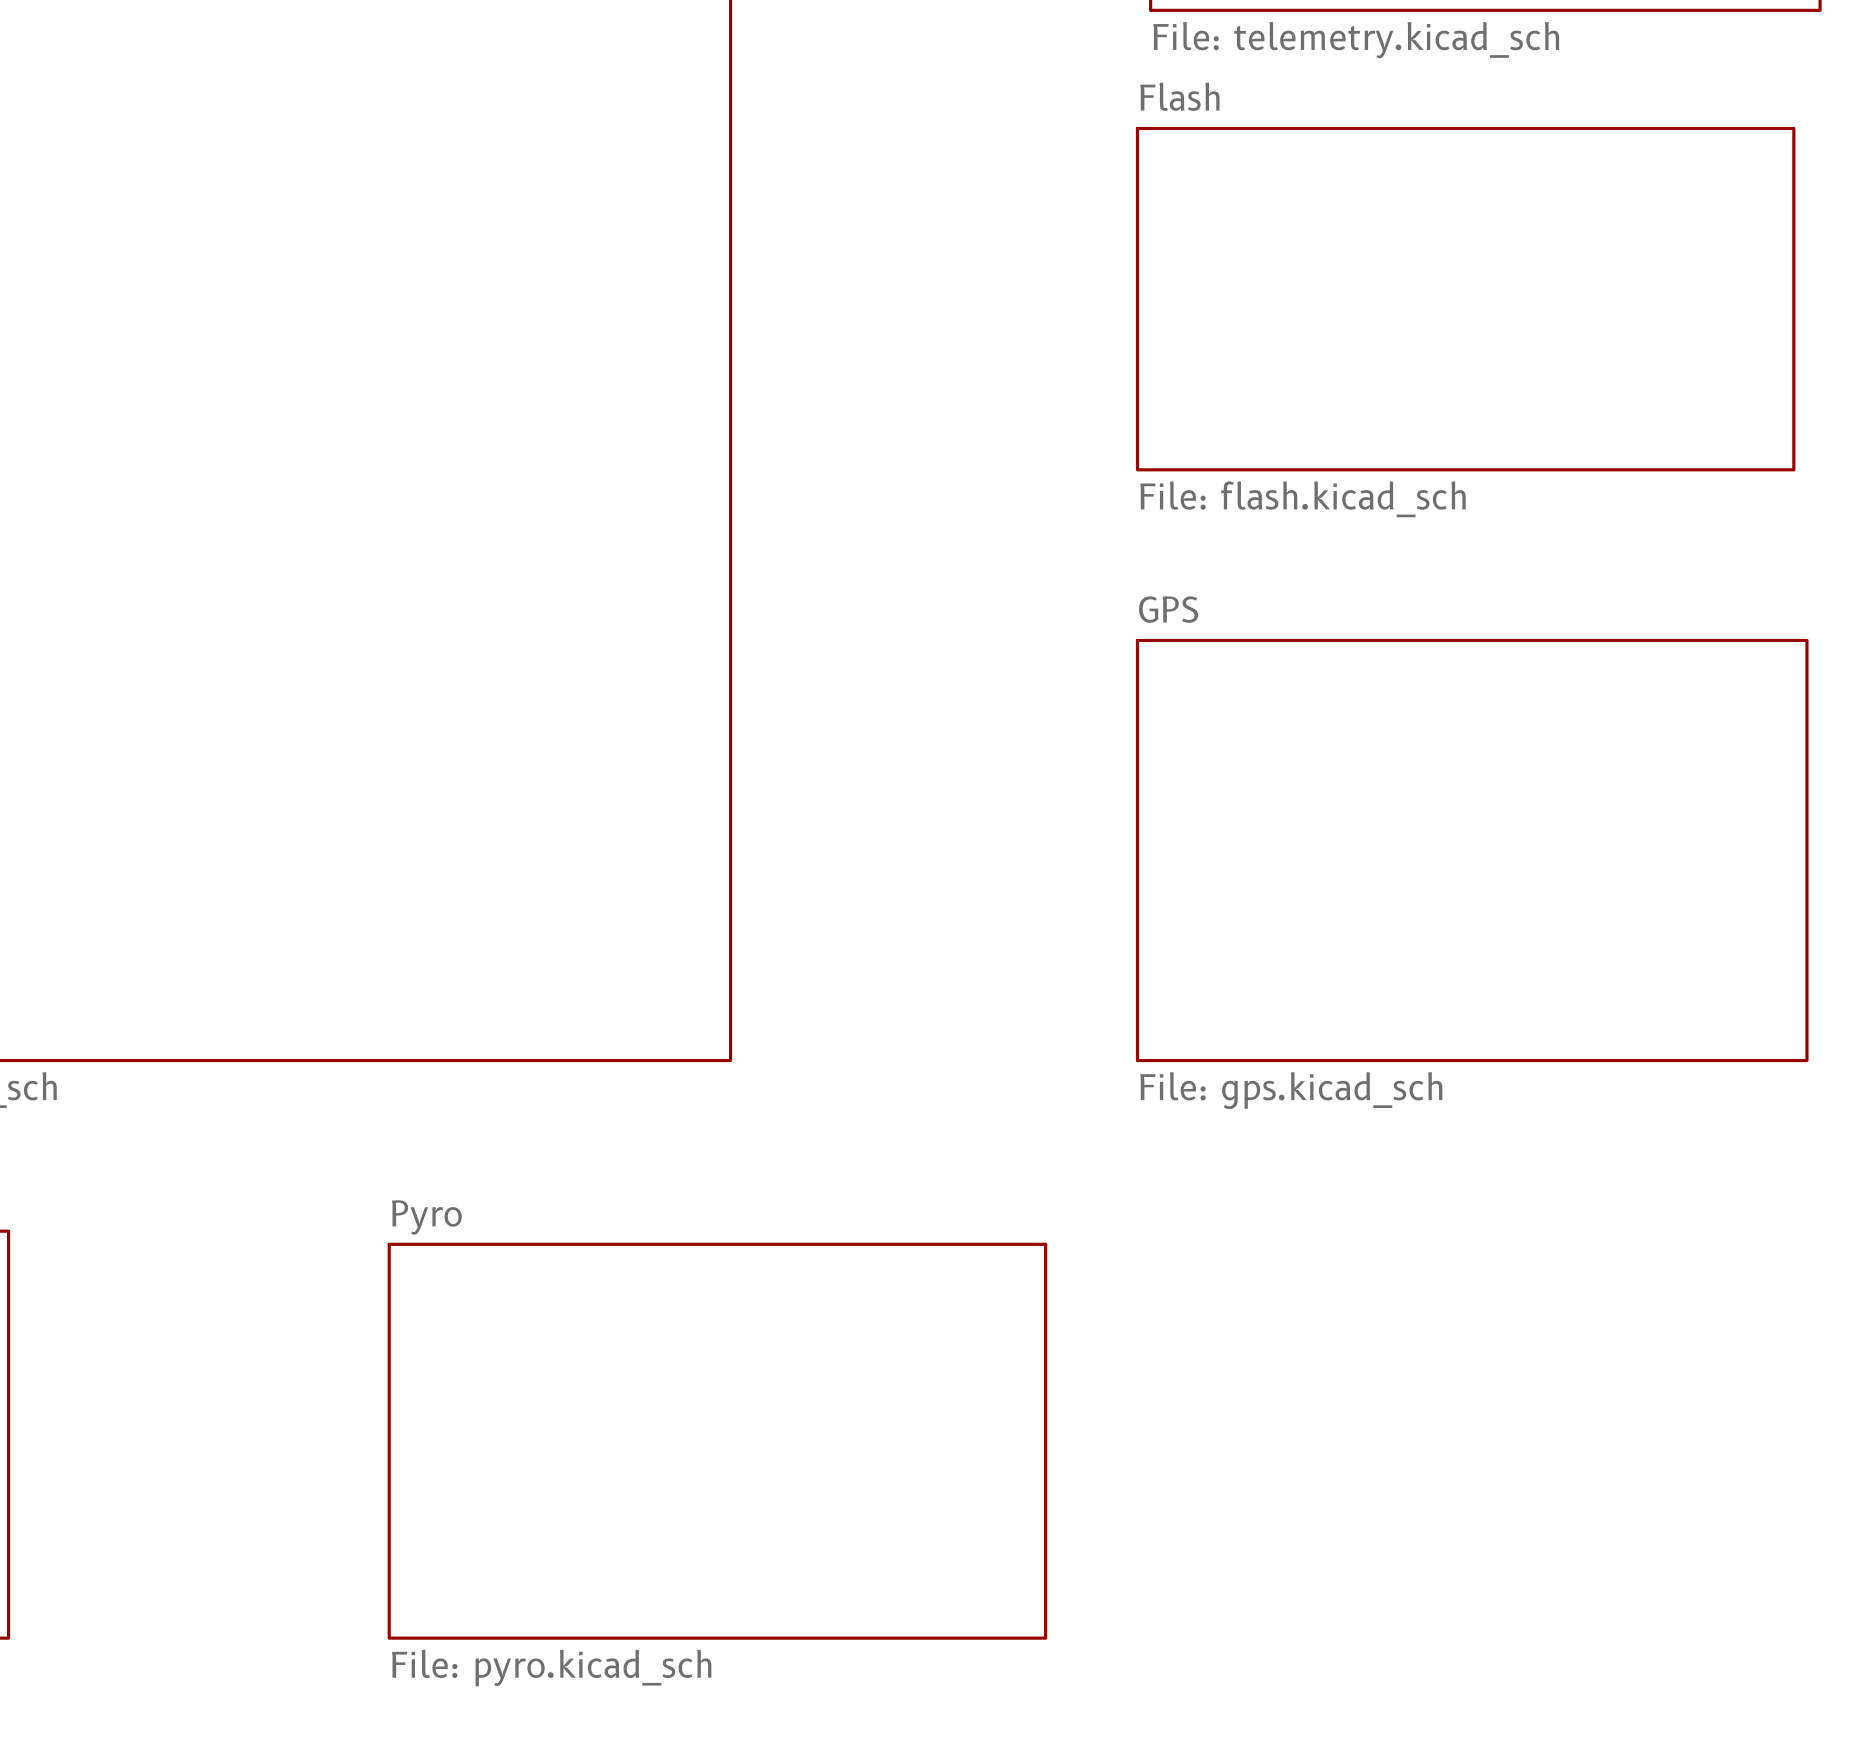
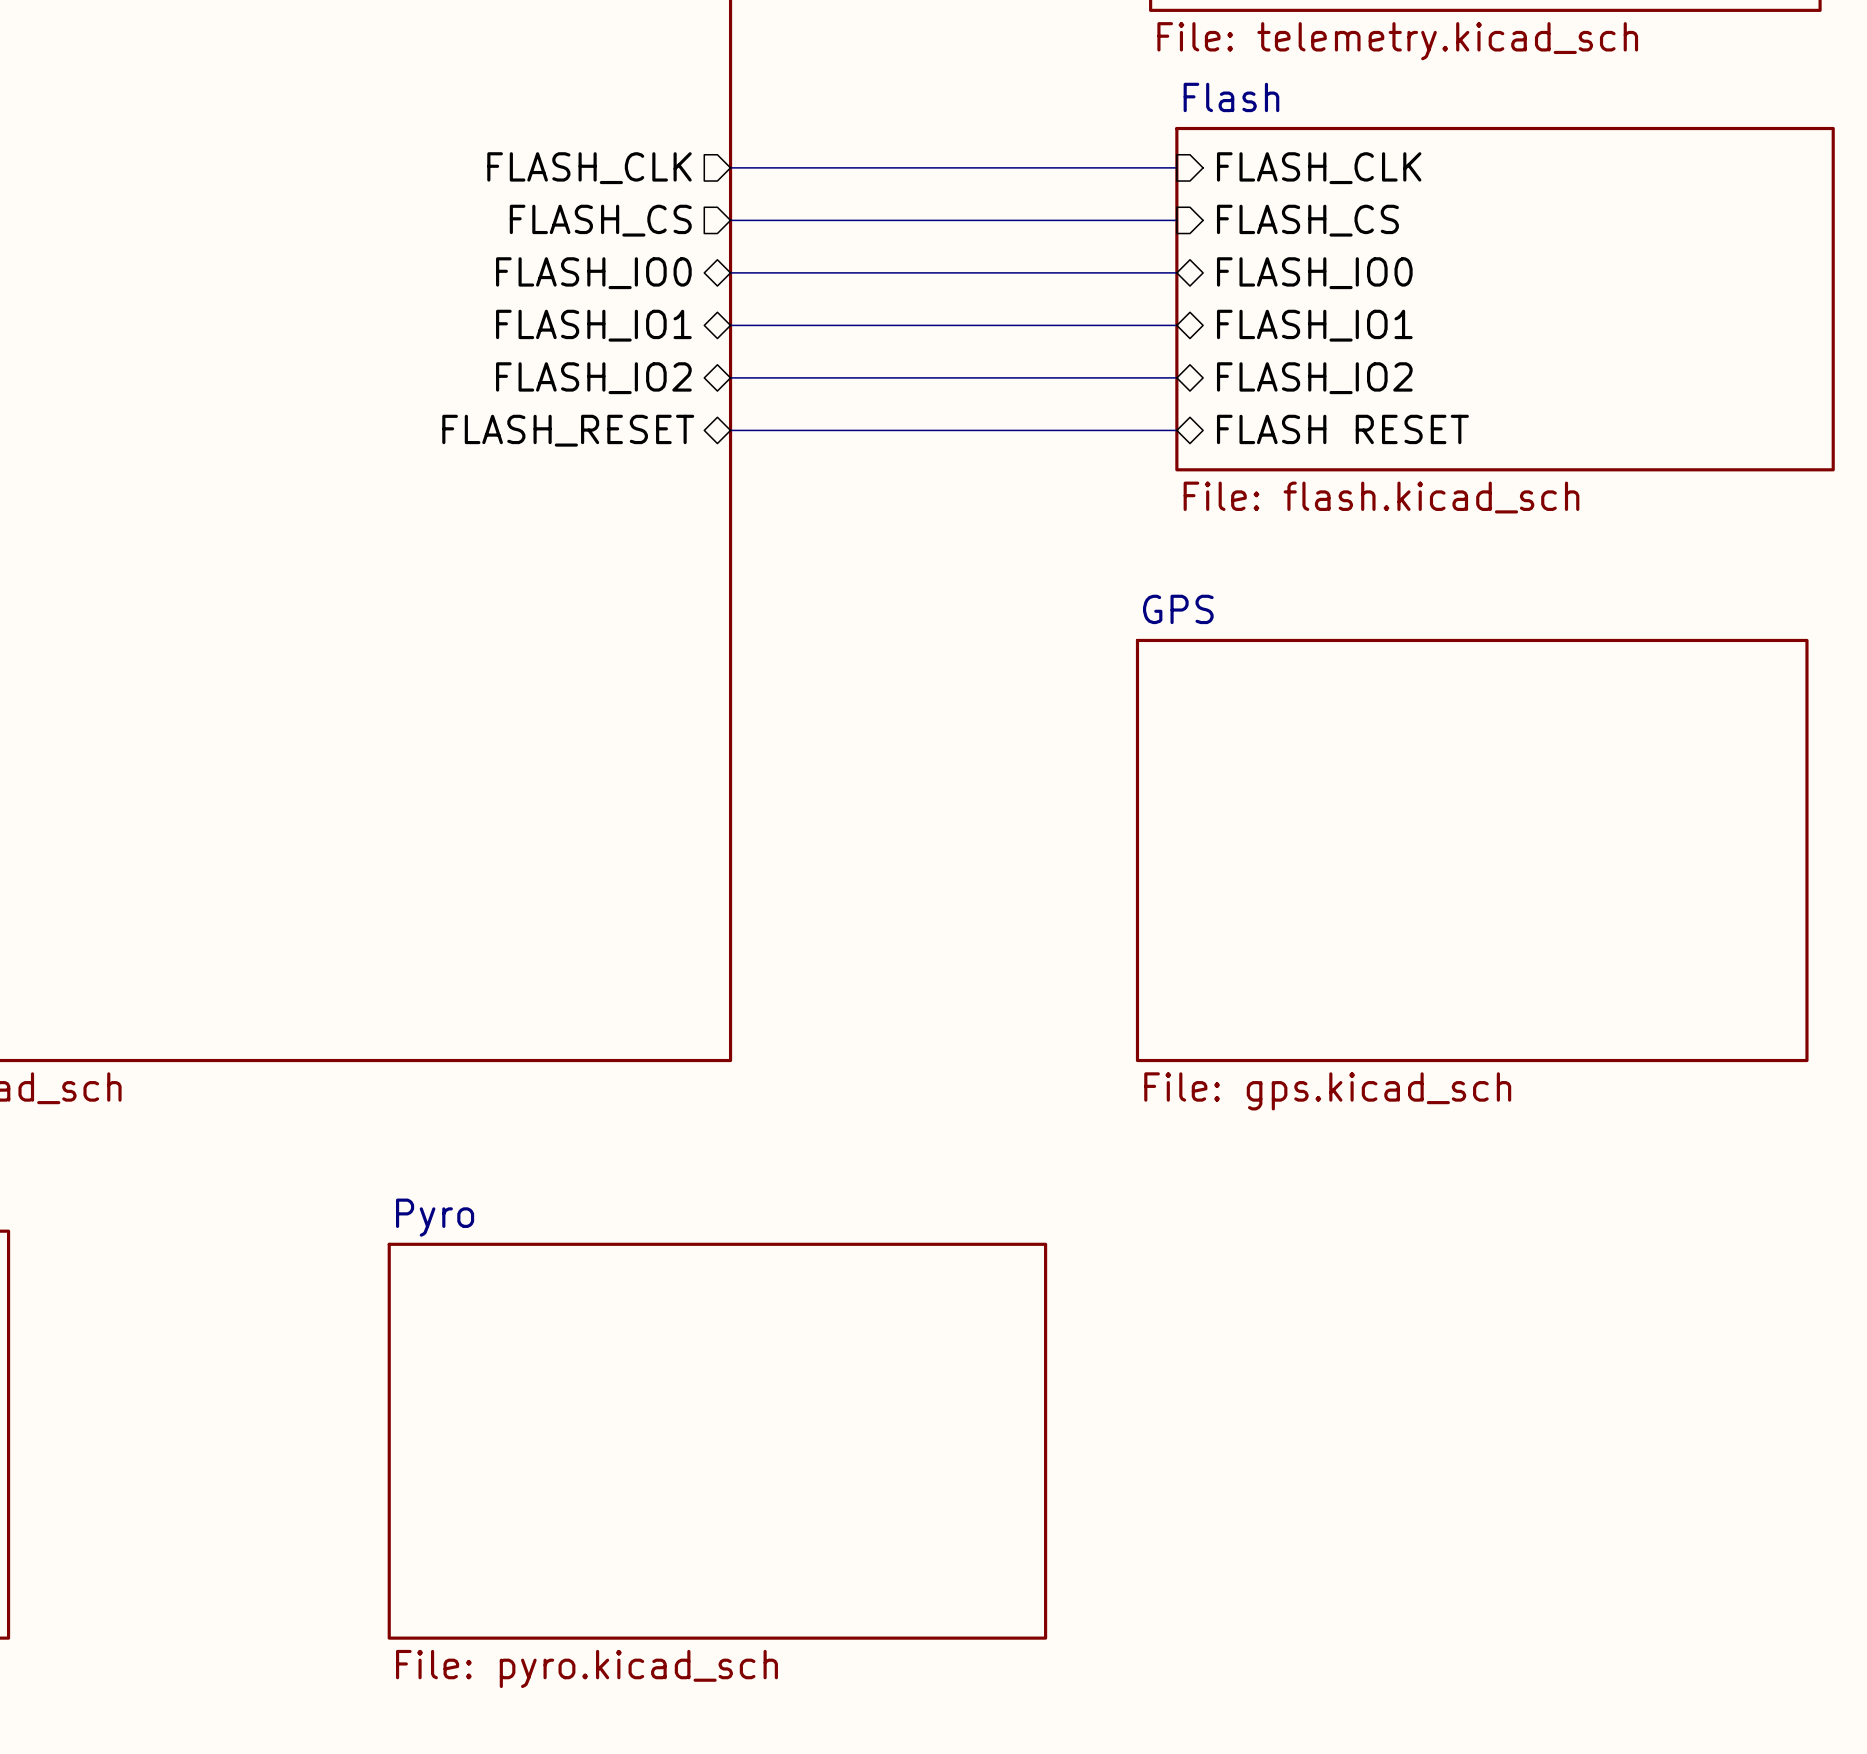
wire: none -> (730, 167) (1176, 167)
sheet pin: none -> FLASH_CLK (589, 168)
sheet pin: none -> FLASH_CLK (1319, 168)
wire: none -> (730, 220) (1176, 220)
sheet pin: none -> FLASH_CS (600, 220)
sheet pin: none -> FLASH_CS (1307, 220)
wire: none -> (730, 272) (1176, 272)
sheet pin: none -> FLASH_IO0 (593, 273)
sheet pin: none -> FLASH_IO0 (1314, 273)
sheet Flash position: (1465, 299) -> (1505, 299)
wire: none -> (730, 325) (1176, 325)
sheet pin: none -> FLASH_IO1 (593, 325)
sheet pin: none -> FLASH_IO1 (1314, 325)
wire: none -> (730, 377) (1176, 377)
sheet pin: none -> FLASH_IO2 (593, 378)
sheet pin: none -> FLASH_IO2 (1314, 378)
sheet pin: none -> FLASH RESET (1342, 429)
wire: none -> (730, 430) (1176, 430)
sheet pin: none -> FLASH_RESET (568, 430)

